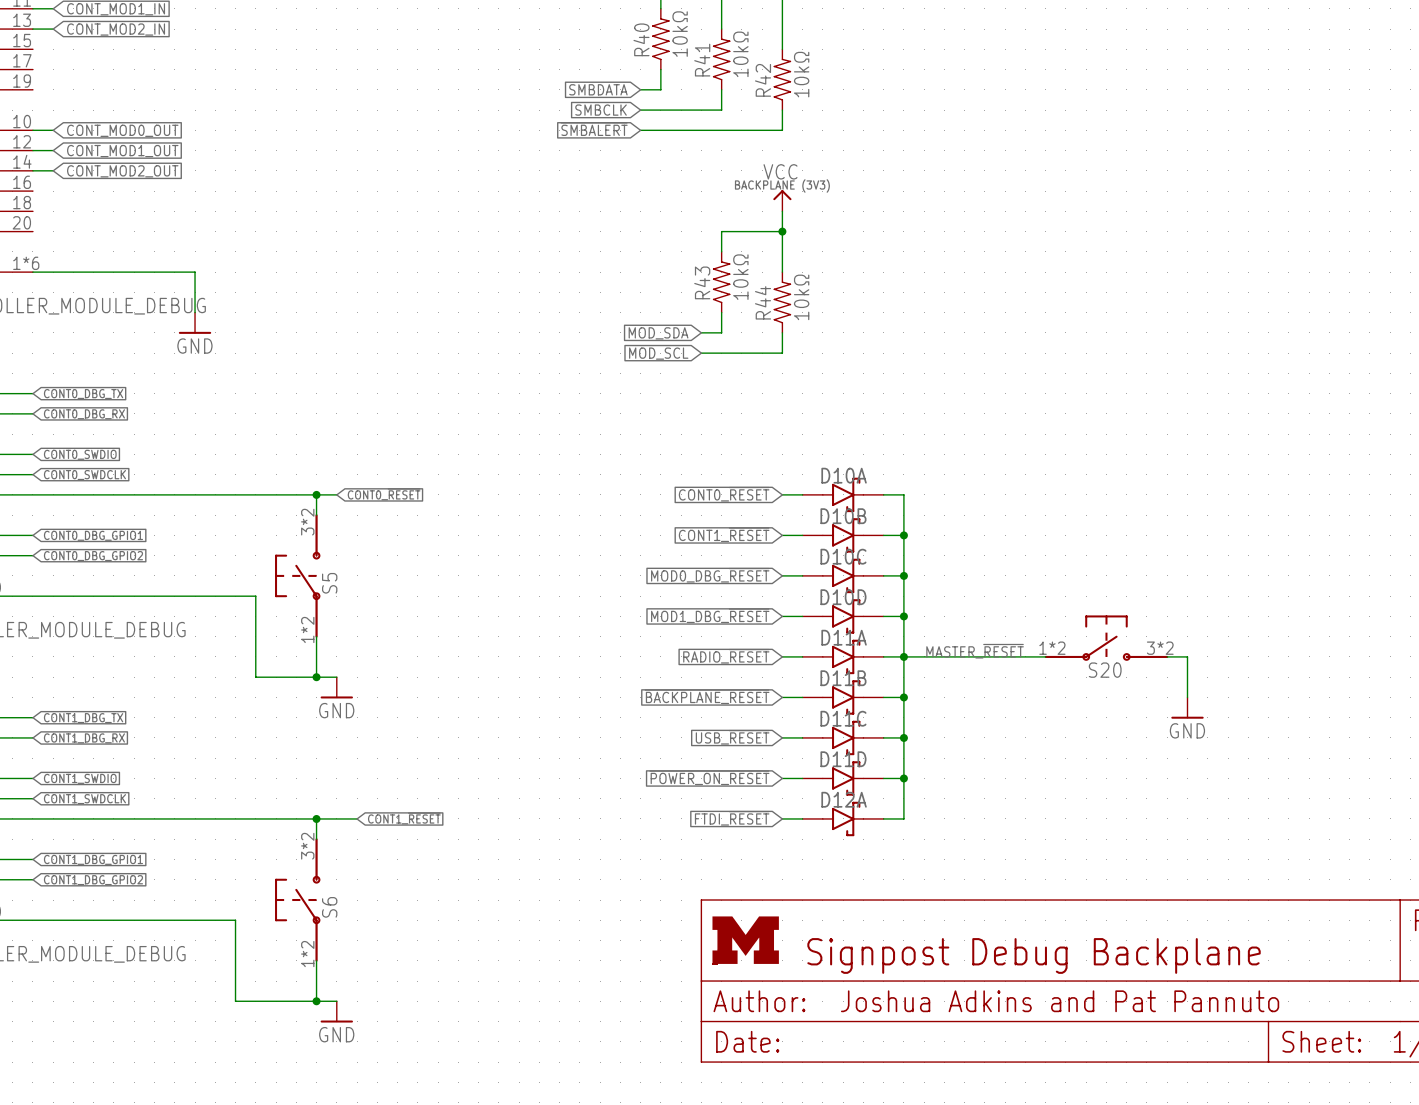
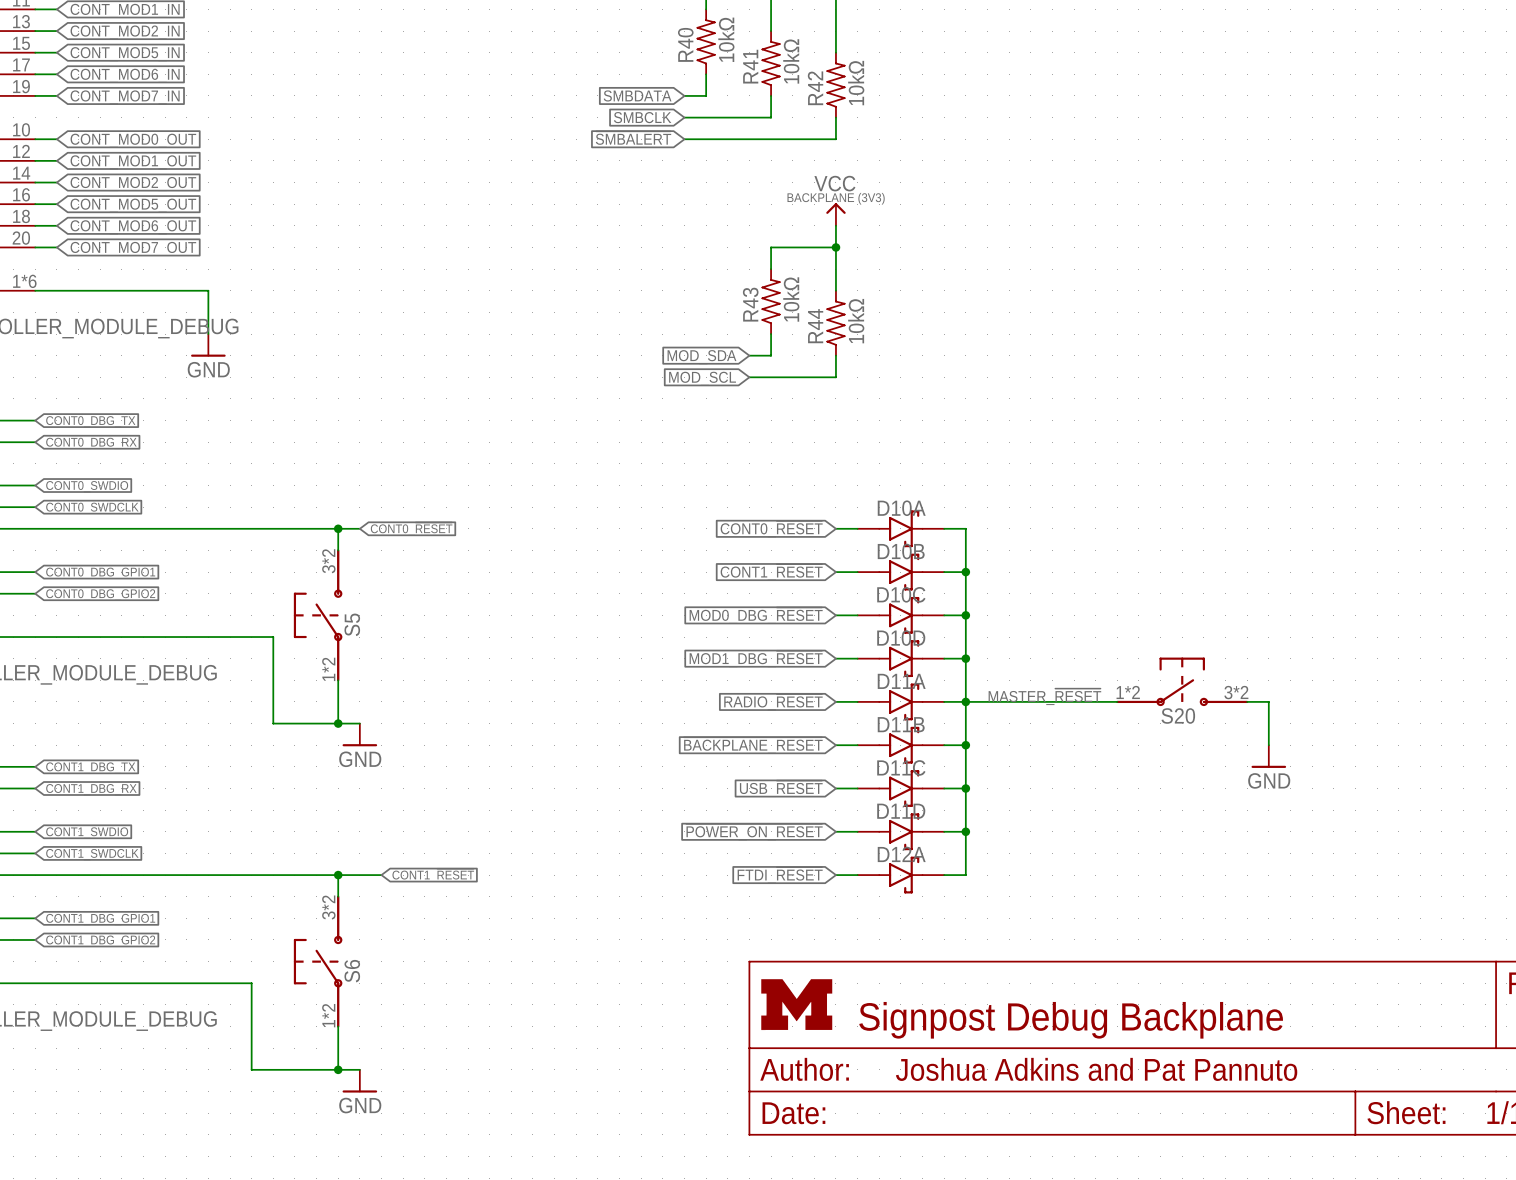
wire: none -> (35, 52) (56, 52)
global label: none -> CONT_MOD5_IN (125, 54)
wire: none -> (35, 74) (56, 74)
global label: none -> CONT_MOD6_IN (125, 75)
wire: none -> (35, 95) (56, 95)
global label: none -> CONT_MOD7_IN (125, 97)
wire: none -> (35, 204) (56, 204)
global label: none -> CONT_MOD5_OUT (133, 205)
wire: none -> (35, 225) (56, 225)
global label: none -> CONT_MOD6_OUT (133, 227)
wire: none -> (35, 247) (56, 247)
global label: none -> CONT_MOD7_OUT (133, 248)

